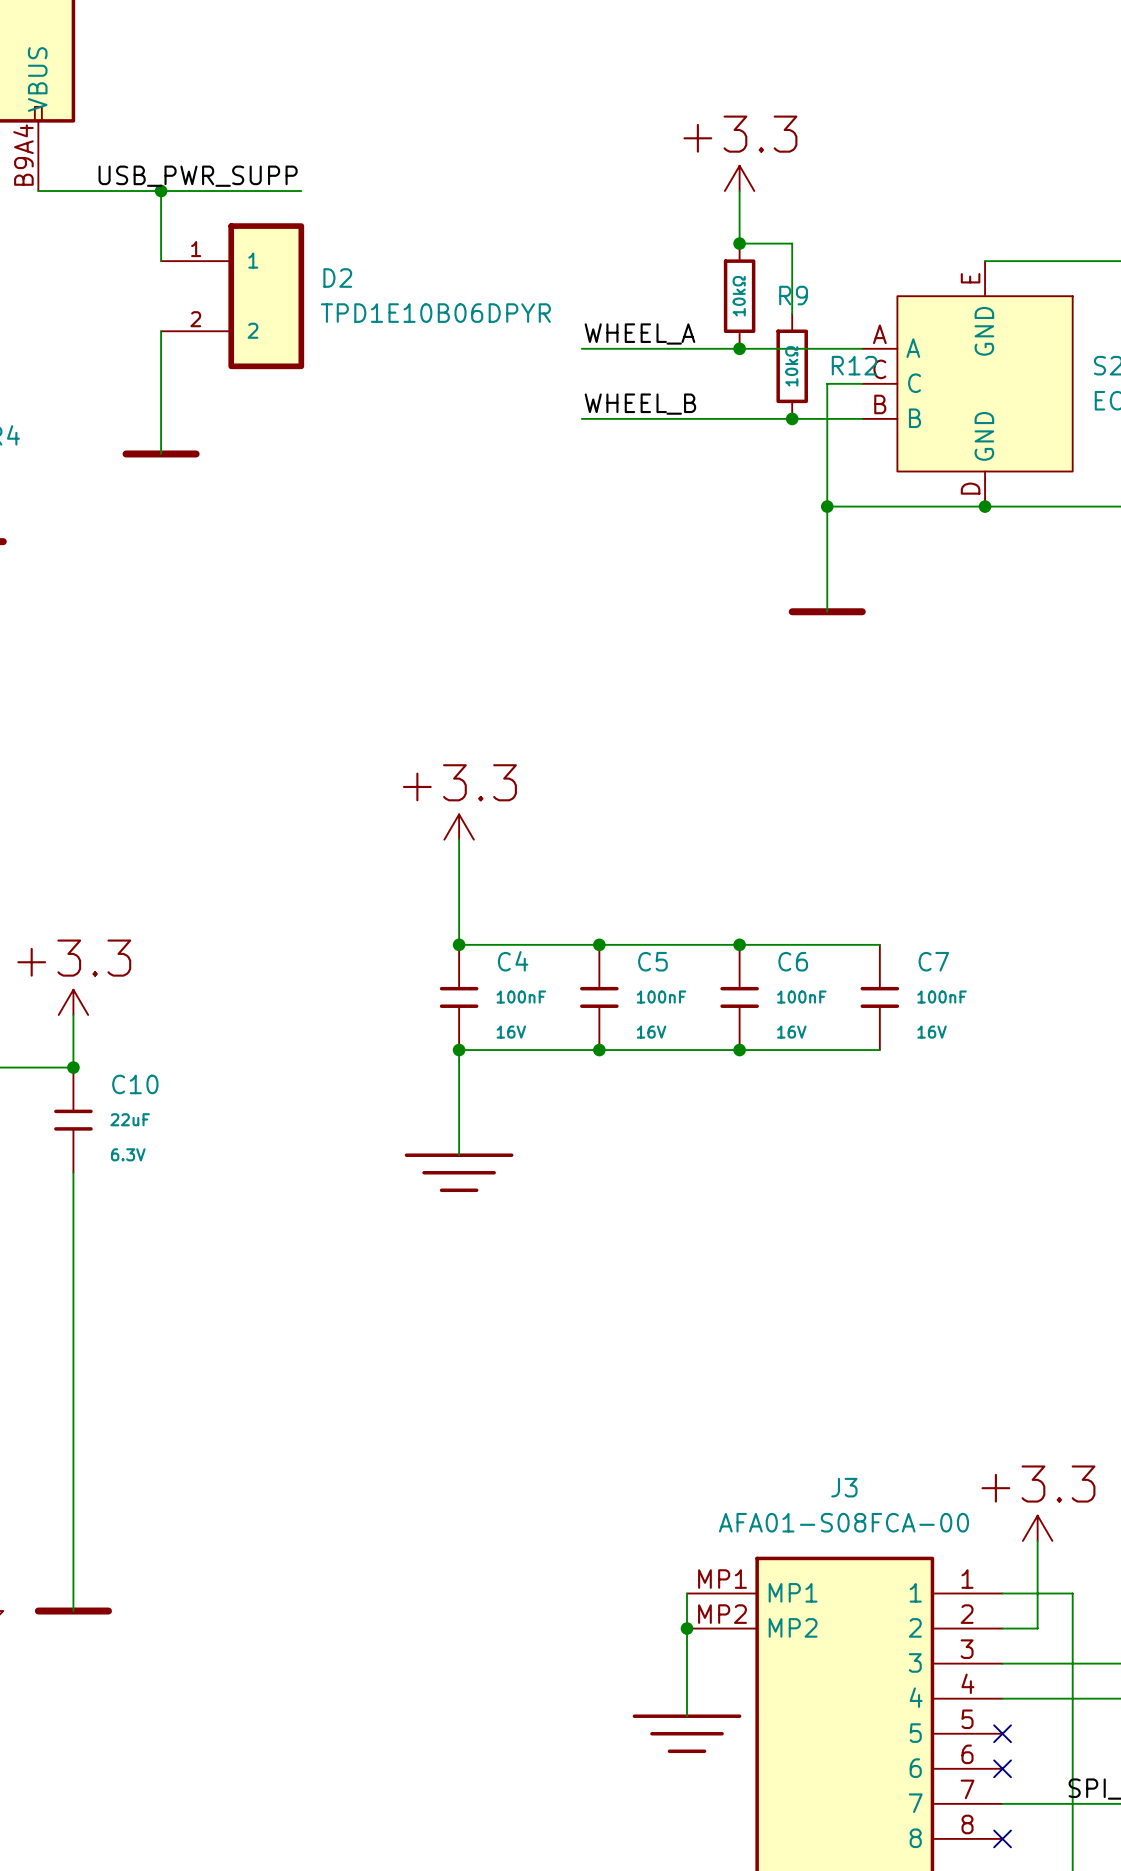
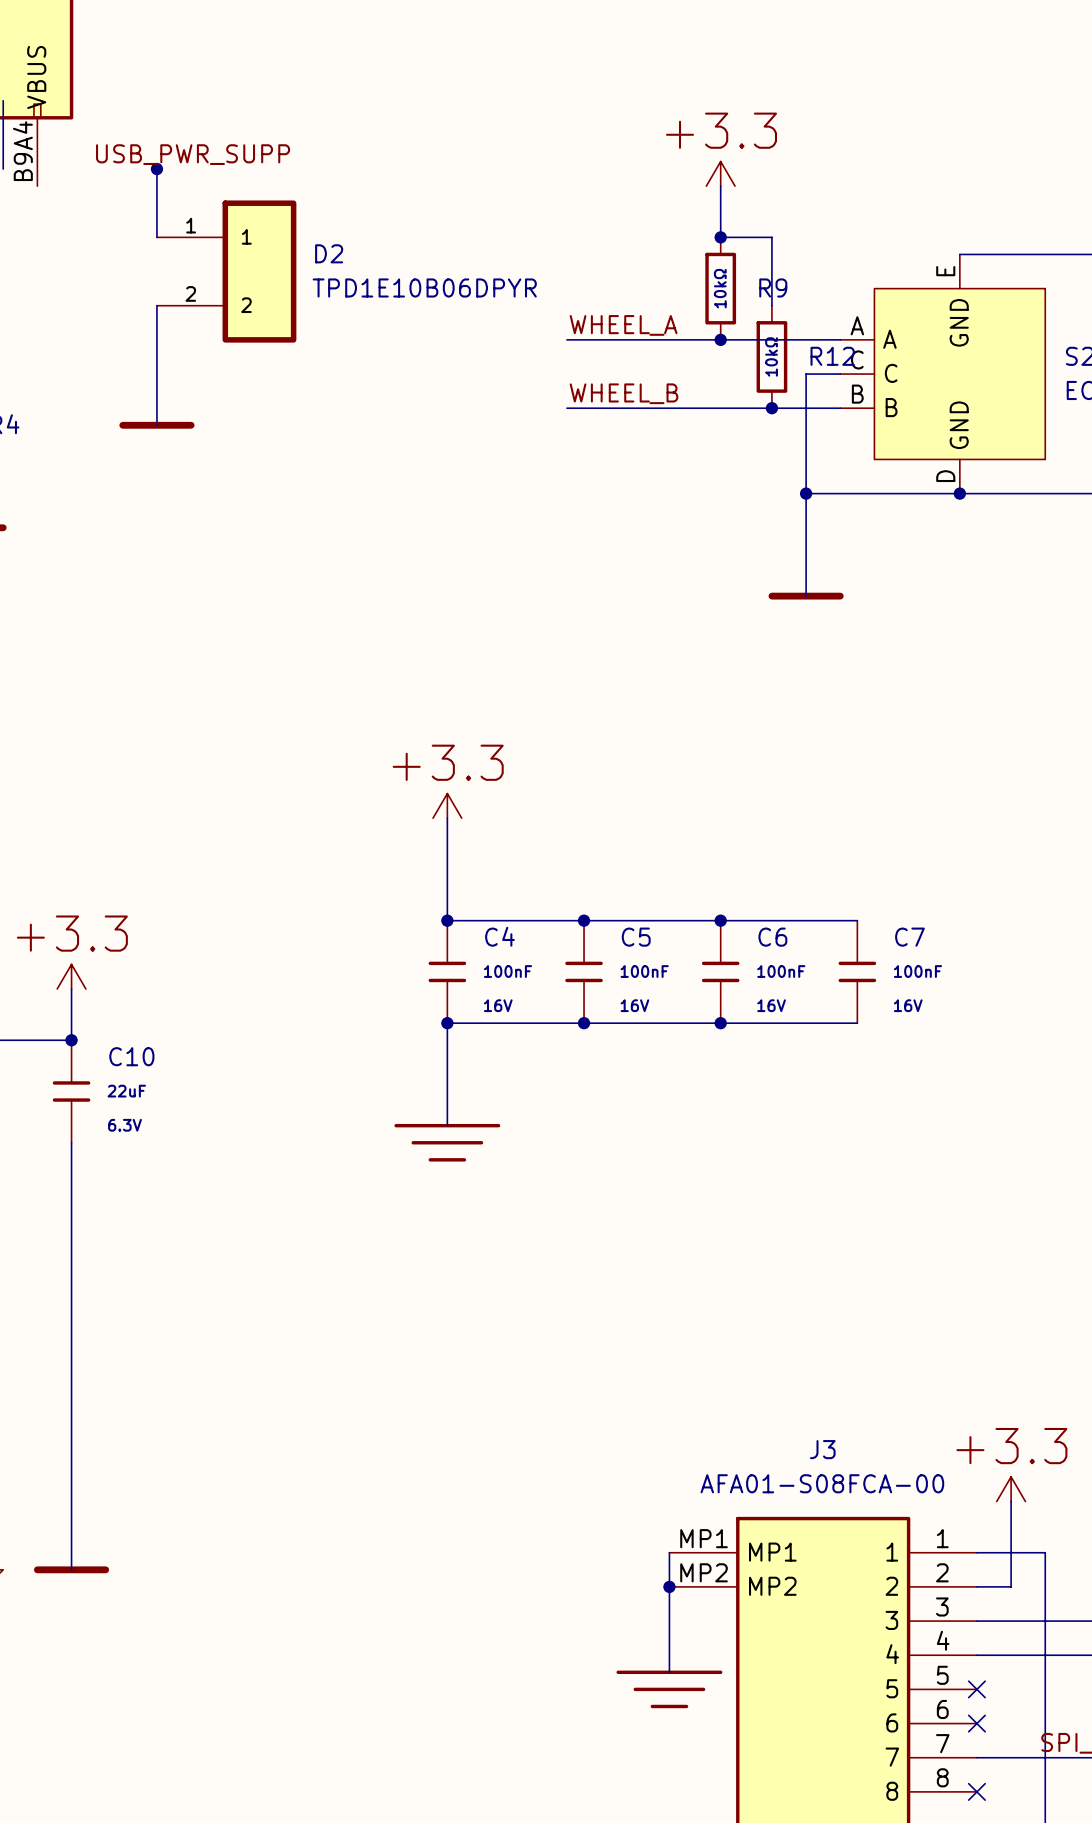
wire: none -> (3, 100) (3, 169)
label position: USB_PWR_SUPP (198, 176) -> USB_PWR_SUPP (193, 154)
wire: (38, 191) (301, 191) -> none
junction position: (161, 191) -> (156, 169)
wire: (161, 243) (161, 261) -> (156, 305) (156, 322)
D2 position: (232, 296) -> (226, 271)
wire: (161, 436) (161, 453) -> (156, 169) (156, 186)
power symbol position: (161, 453) -> (156, 425)

